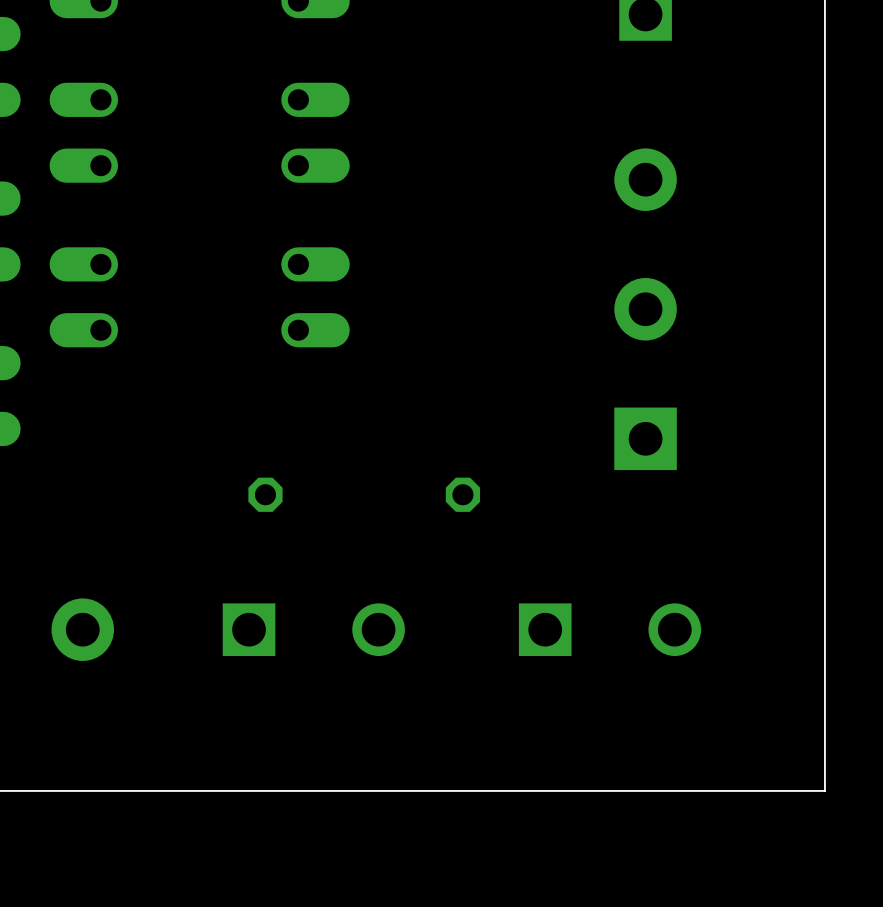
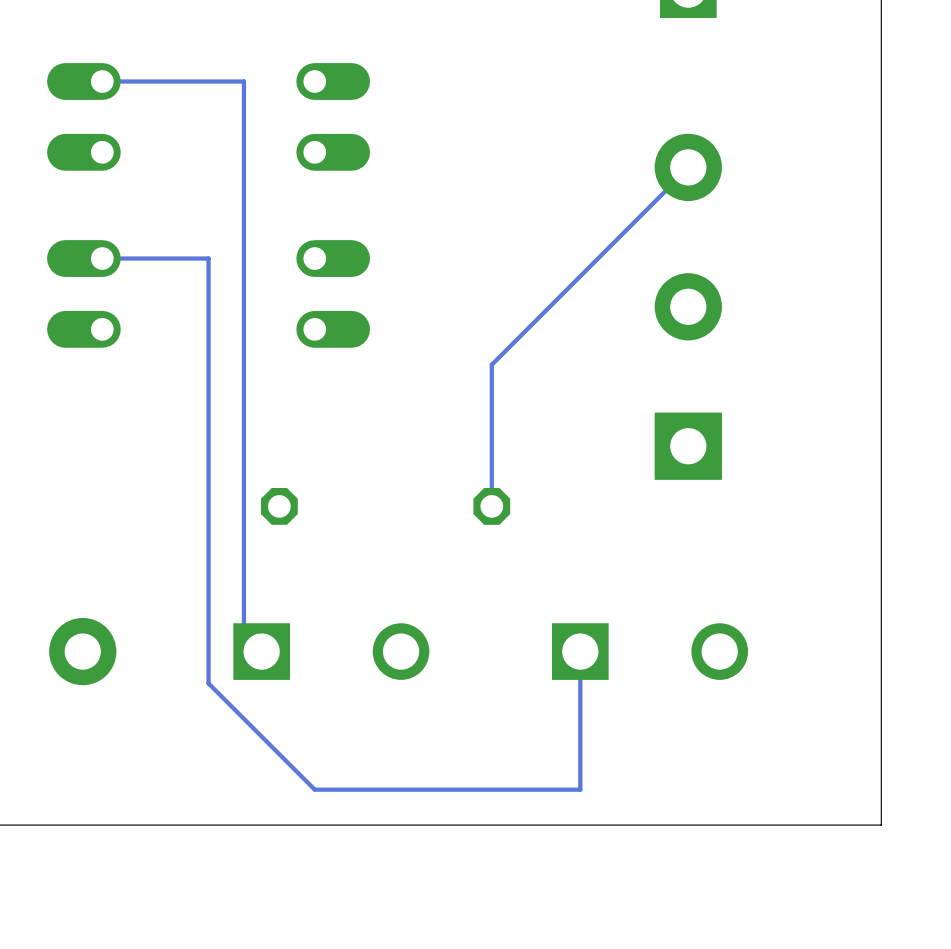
track: none -> (102, 81) (243, 81) (243, 630) (261, 648) (261, 651)
track: none -> (688, 167) (491, 364) (491, 506)
track: none -> (102, 258) (208, 258) (208, 683) (314, 789) (580, 789) (580, 651)

